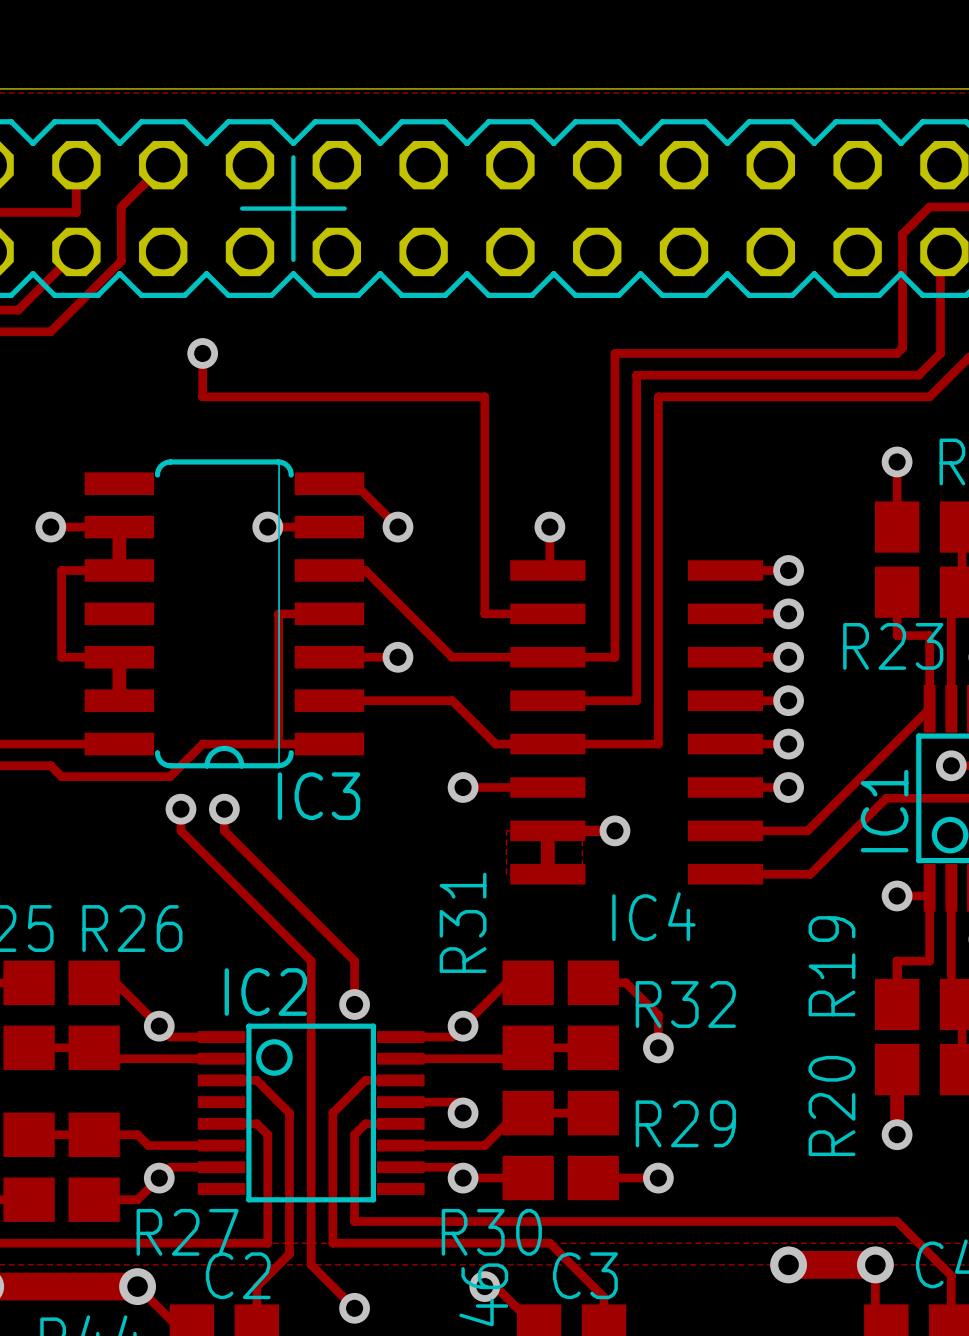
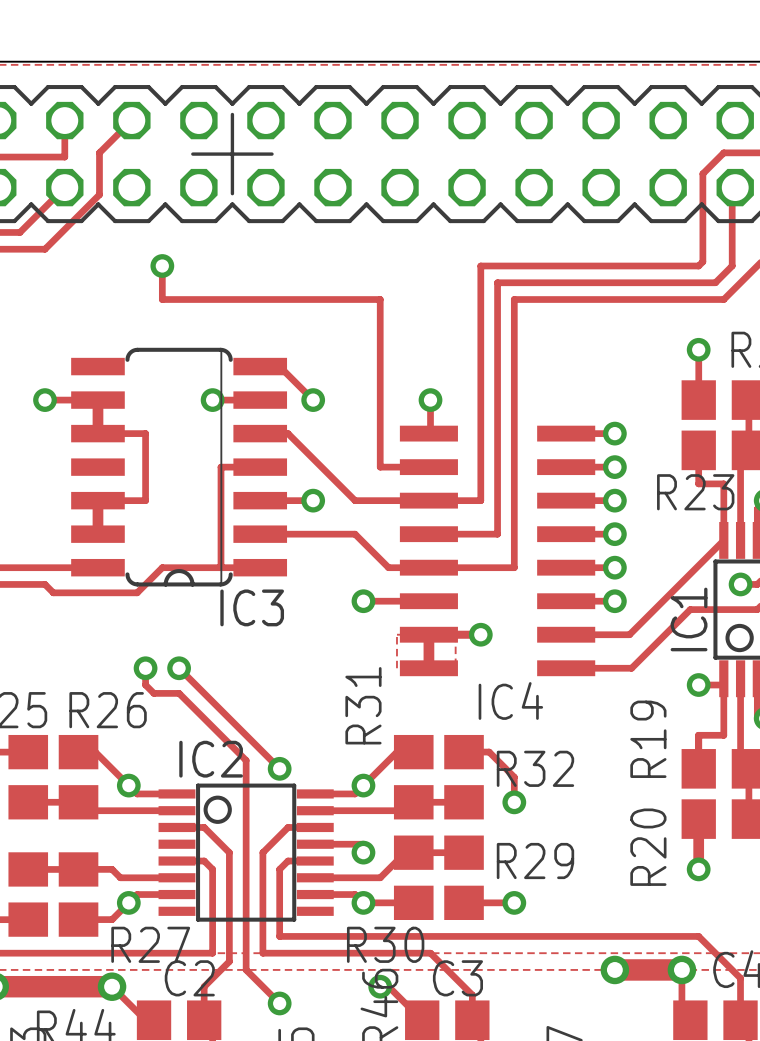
track: (119, 570) (61, 570) (61, 657) (119, 657) -> (97, 433) (145, 433) (145, 500) (97, 500)
track: (180, 809) (180, 830) (224, 874) -> none
via: (180, 809) -> none
track: (224, 809) (224, 830) (354, 961) (354, 1004) -> none
via: (224, 809) -> none
track: none -> (145, 668) (145, 685) (153, 693) (179, 693) (246, 760)
via: none -> (145, 668)
via: none -> (179, 668)
track: (311, 961) (311, 993) -> (246, 735) (279, 768)

